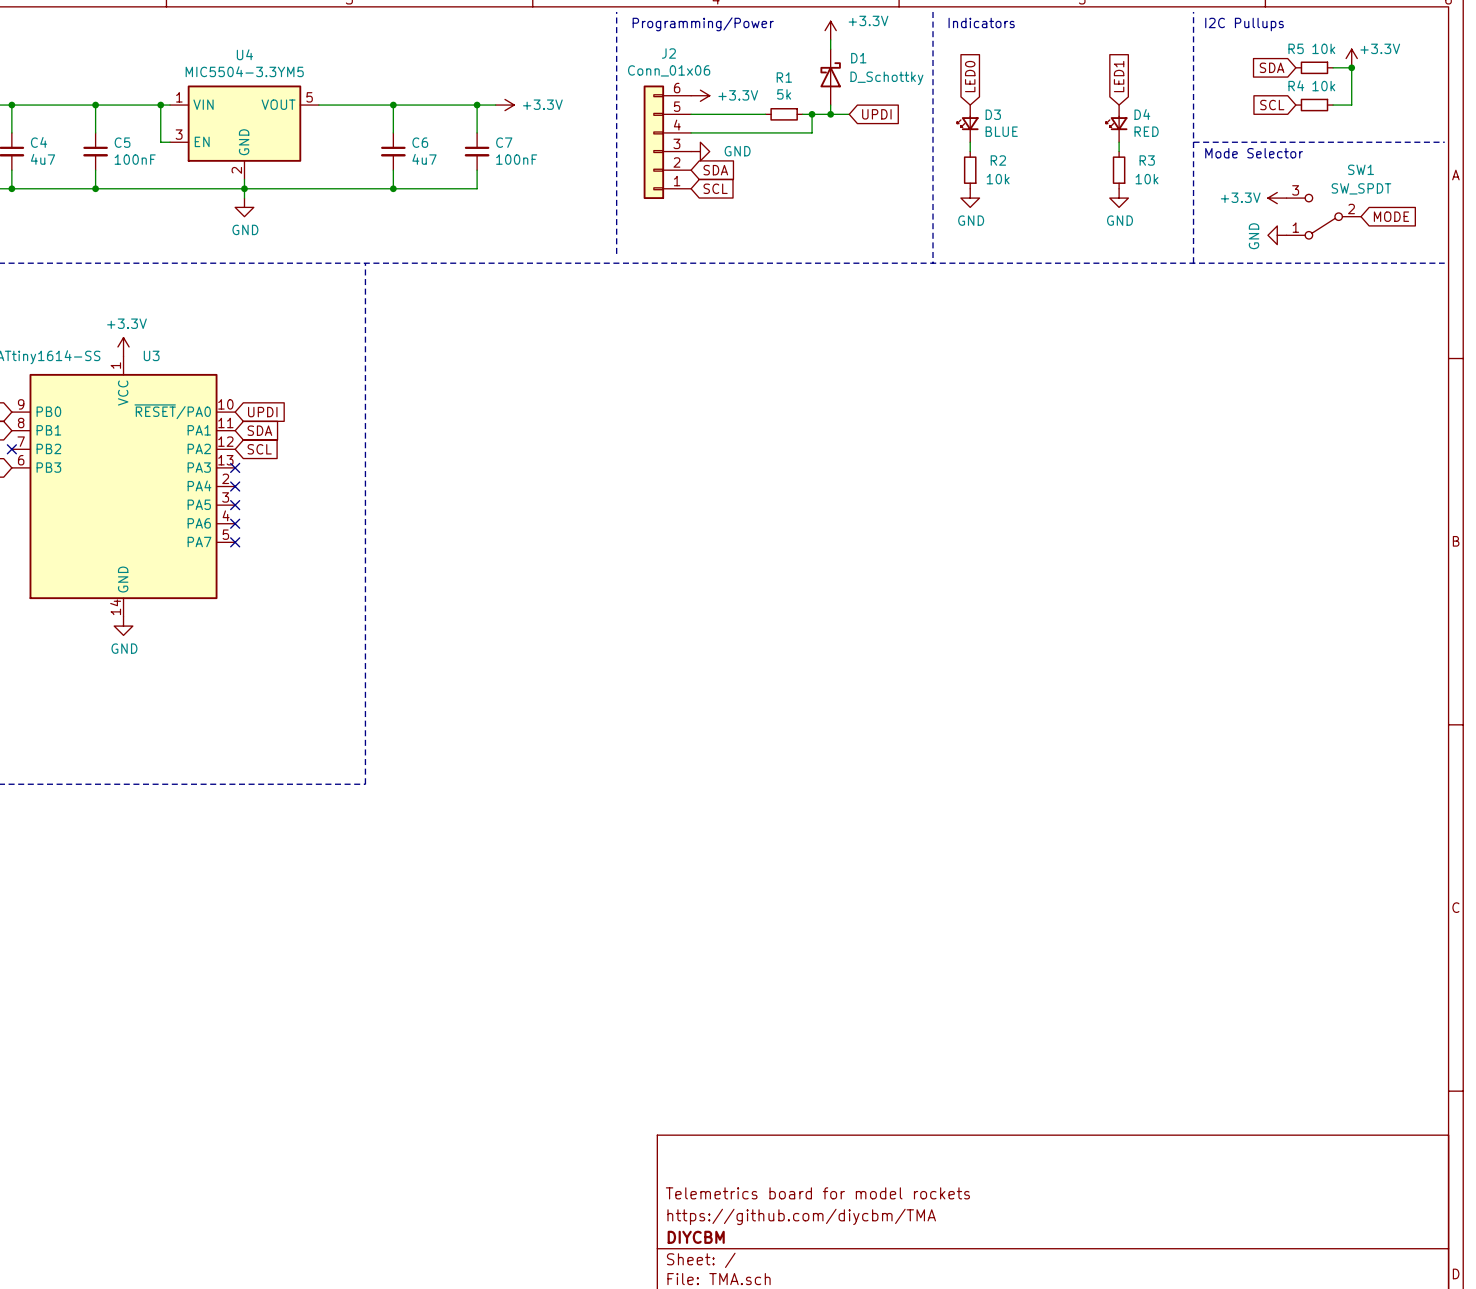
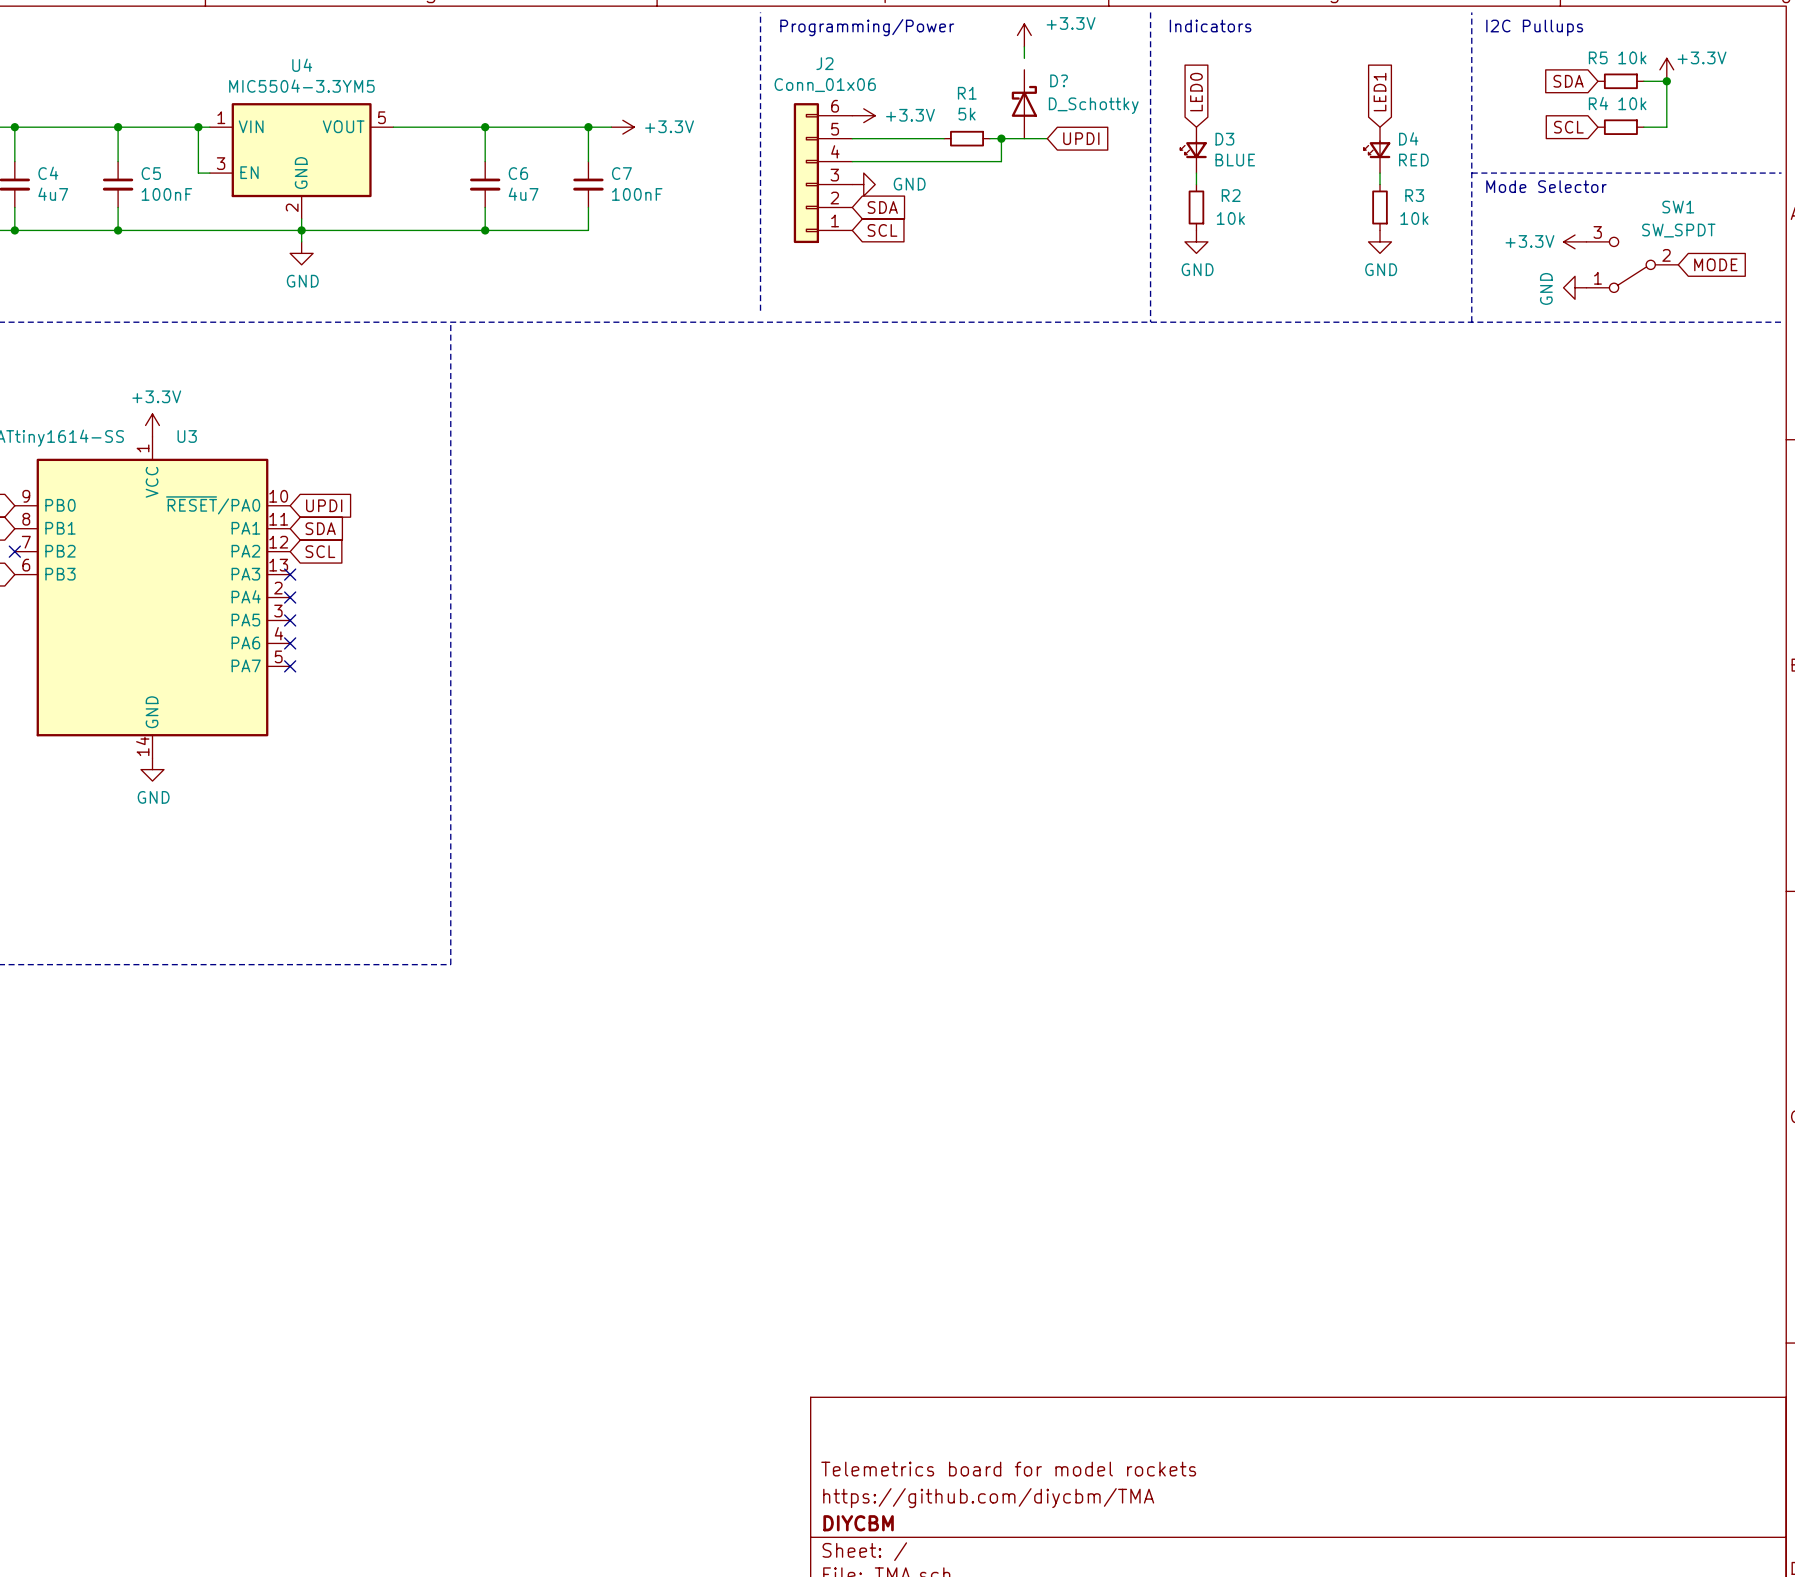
D1: D_Schottky (830, 77) -> none
D?: none -> D_Schottky (1024, 104)
junction: (830, 114) -> none

